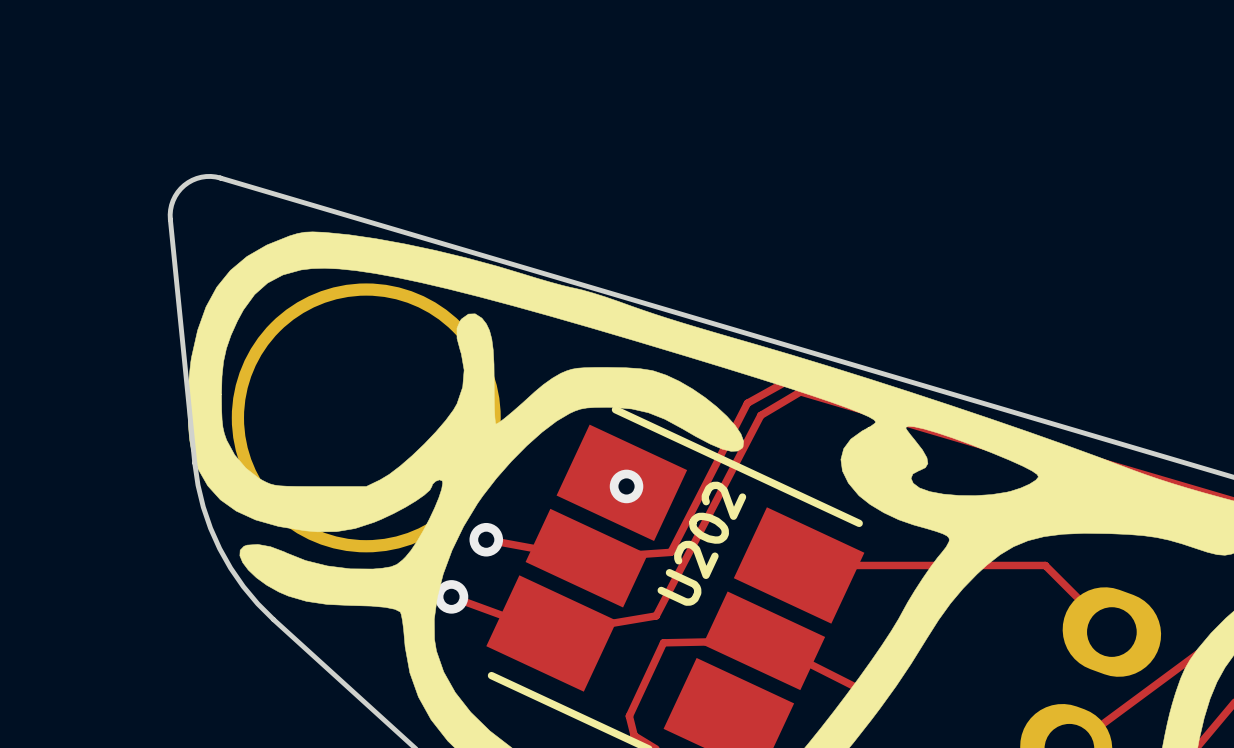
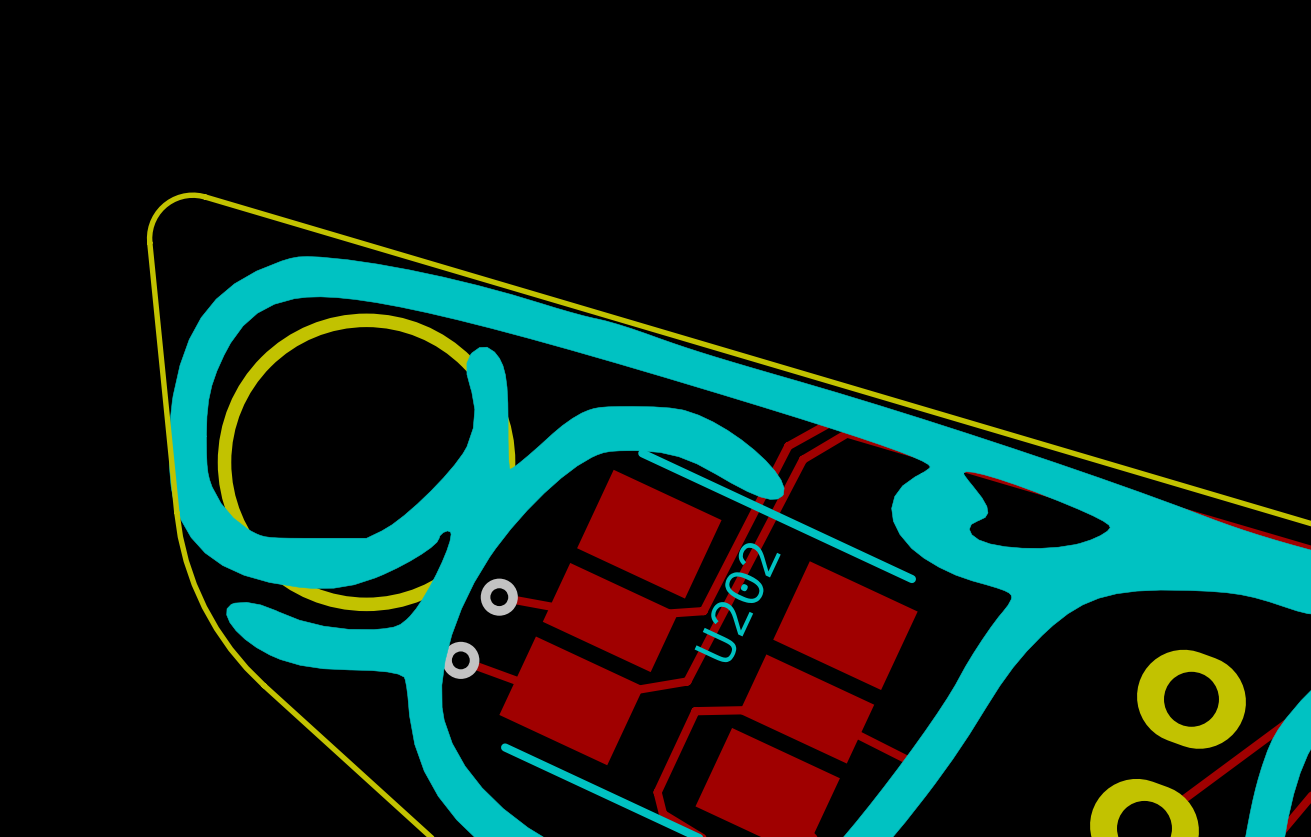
via: (626, 486) -> none
track: (799, 565) (1045, 565) (1111, 632) -> none

